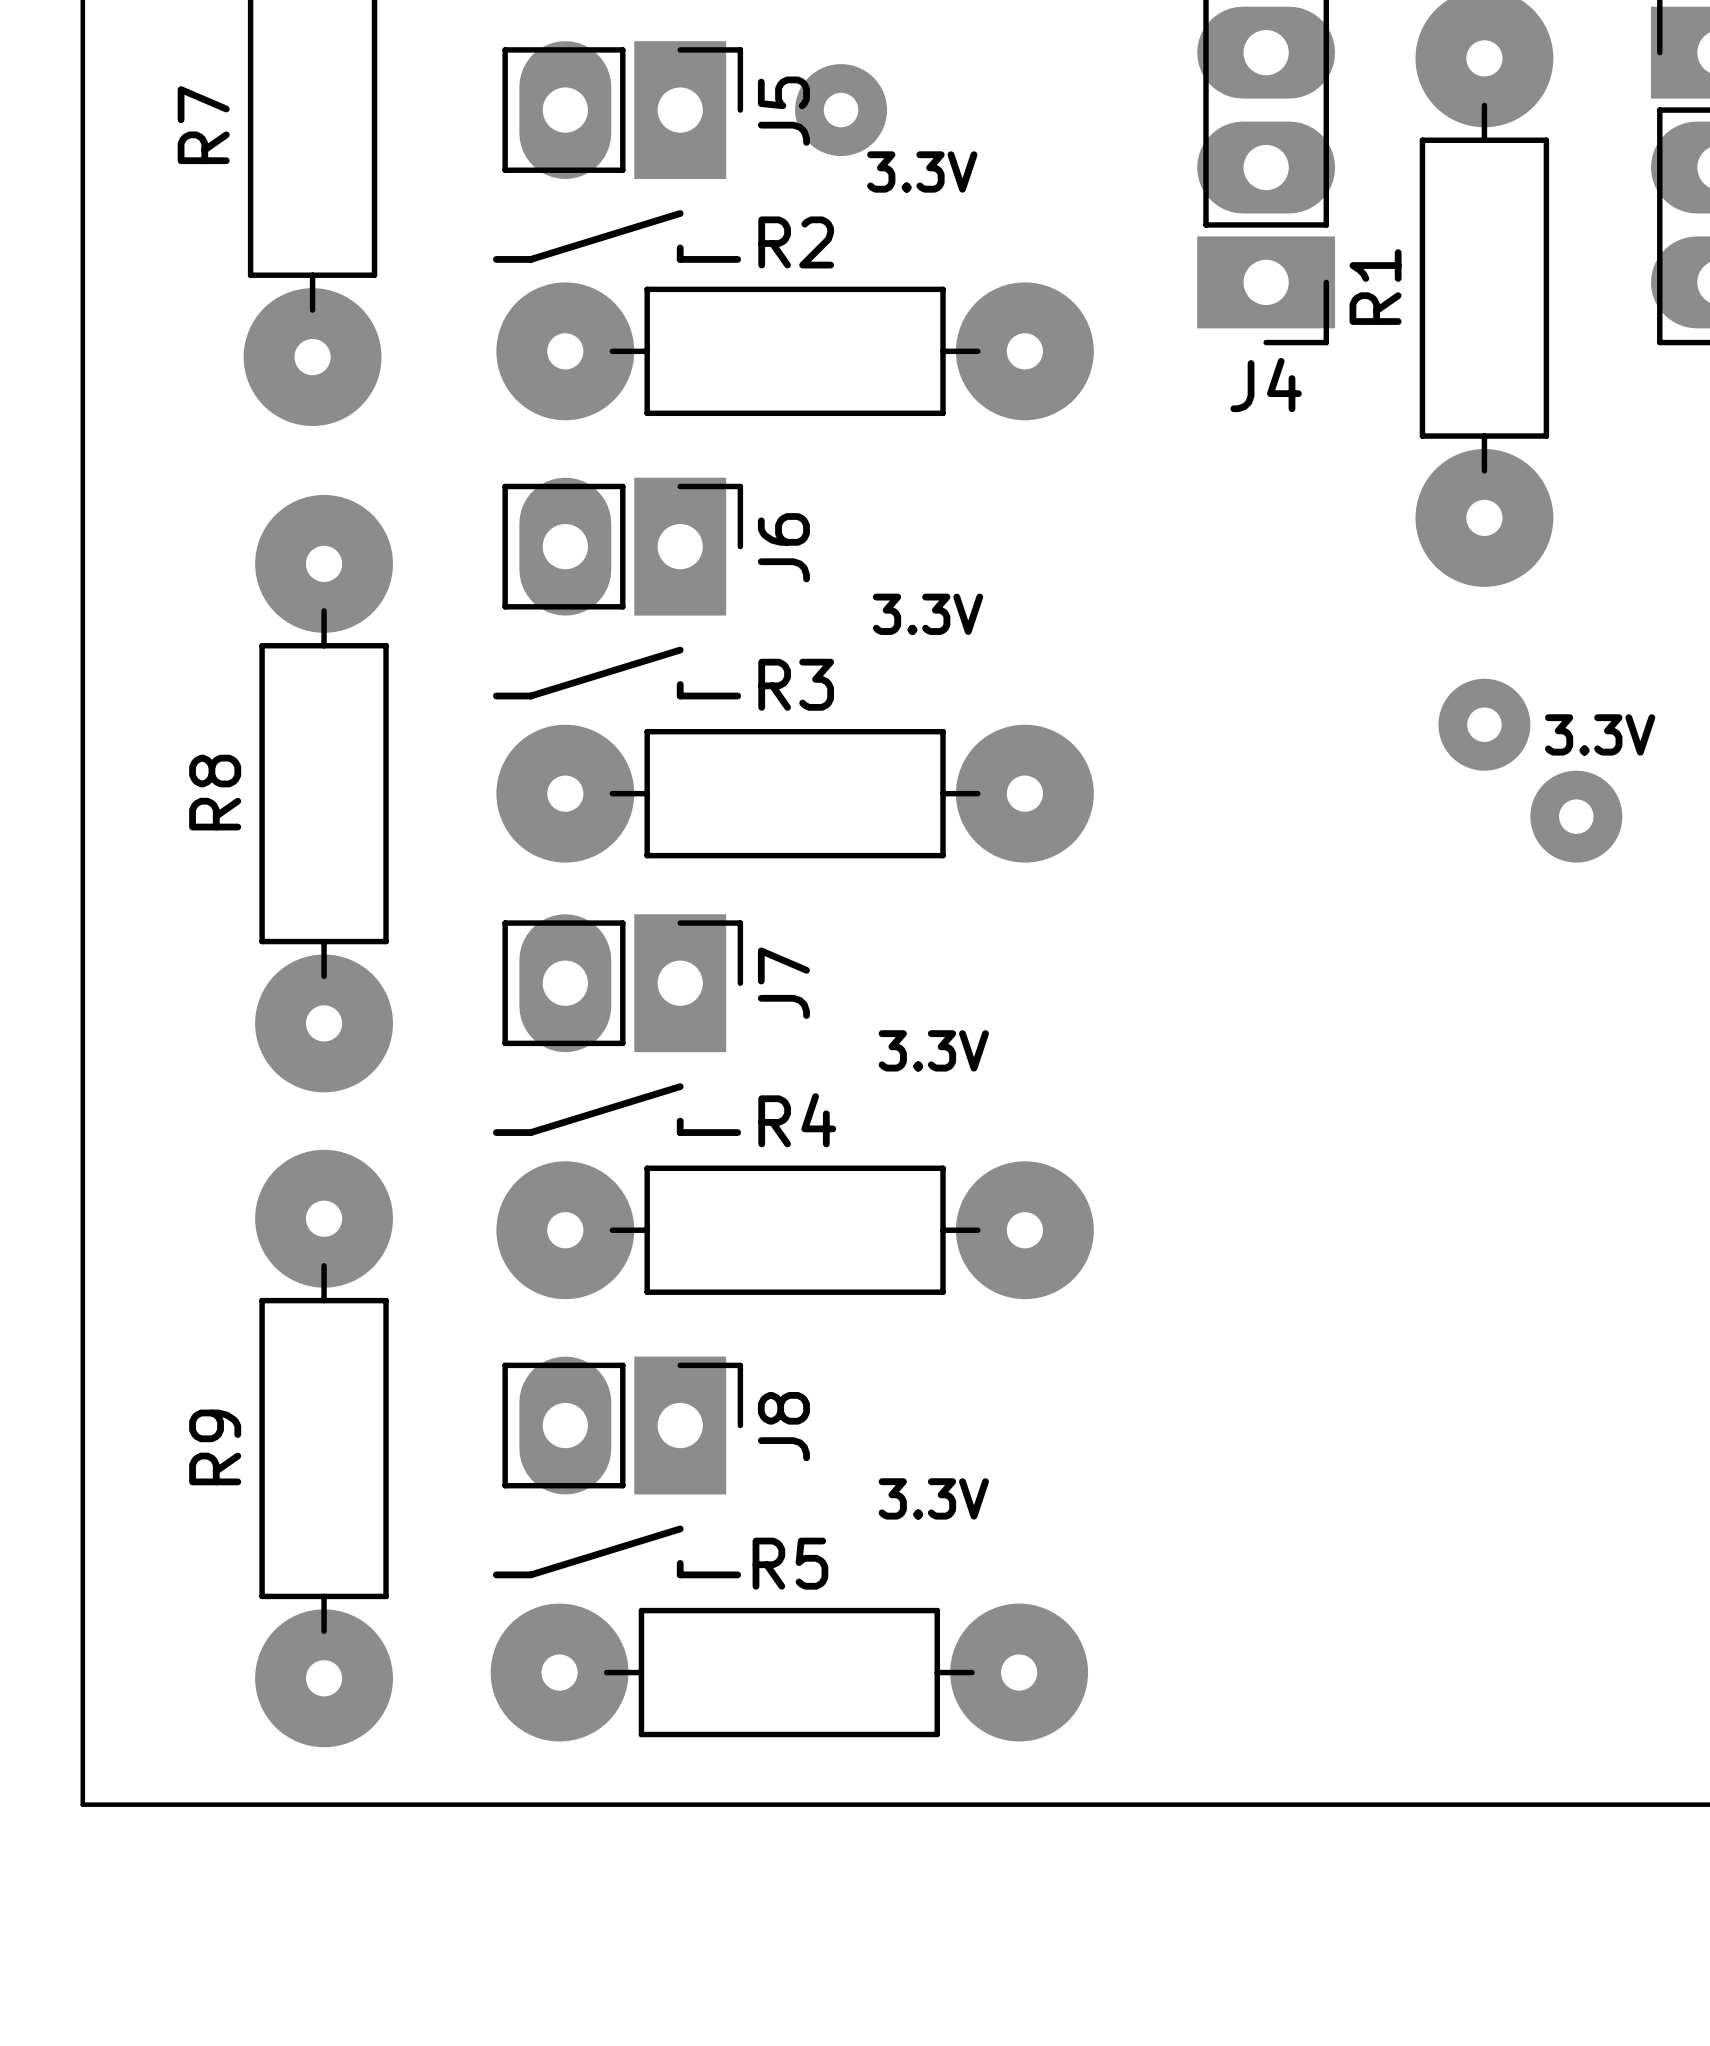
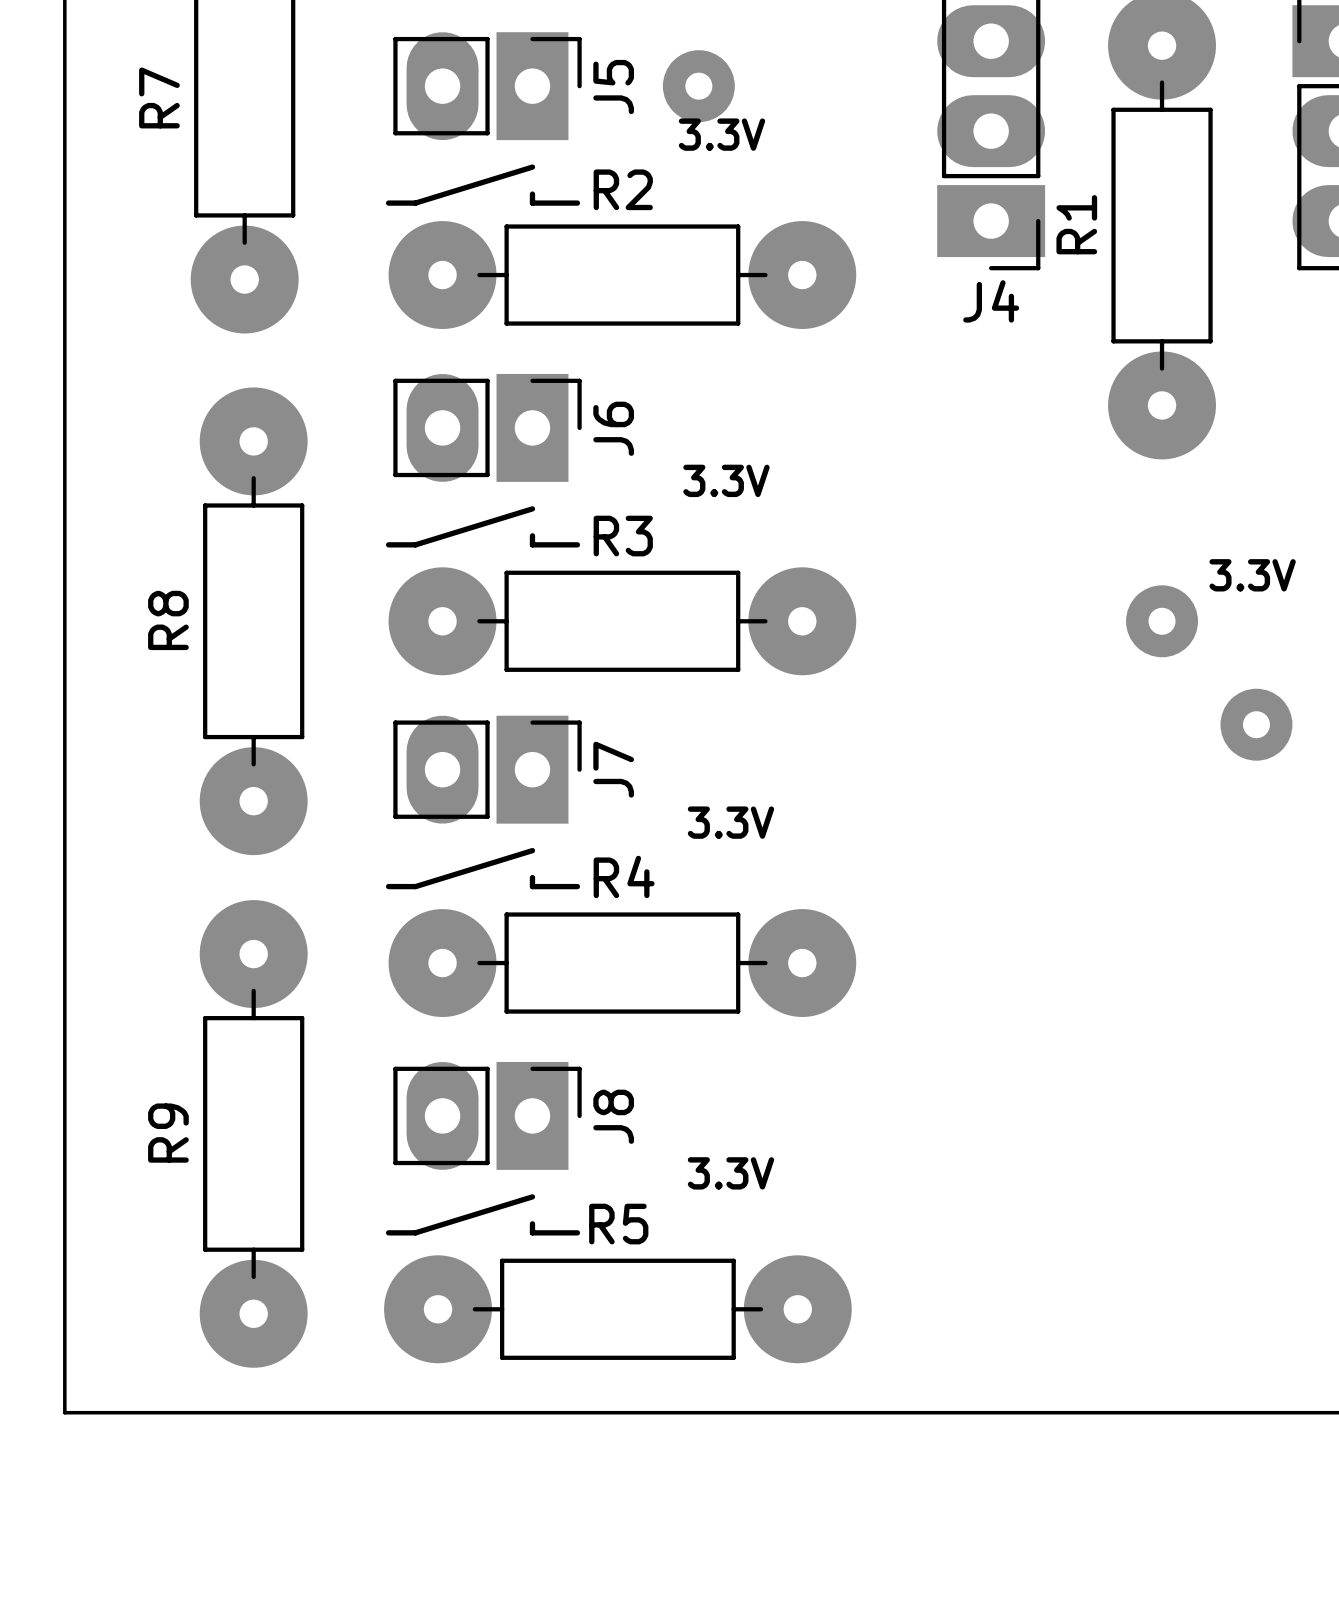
via position: (841, 110) -> (698, 86)
via: (1484, 724) -> none
via: none -> (1162, 621)
via: (1576, 816) -> none
via: none -> (1256, 724)

